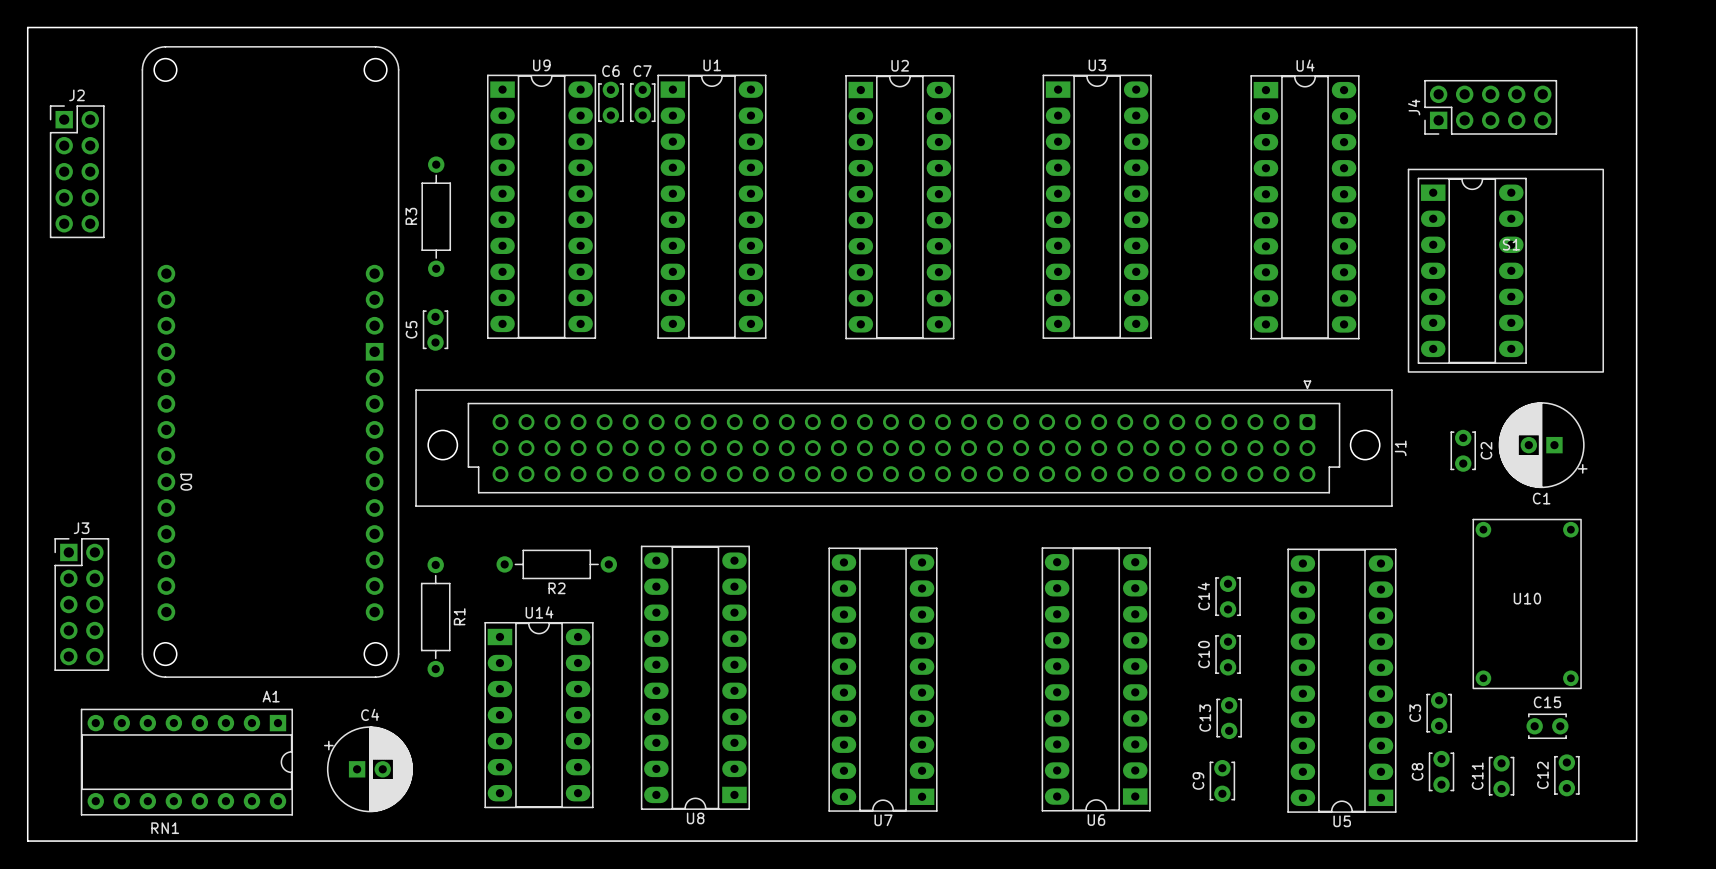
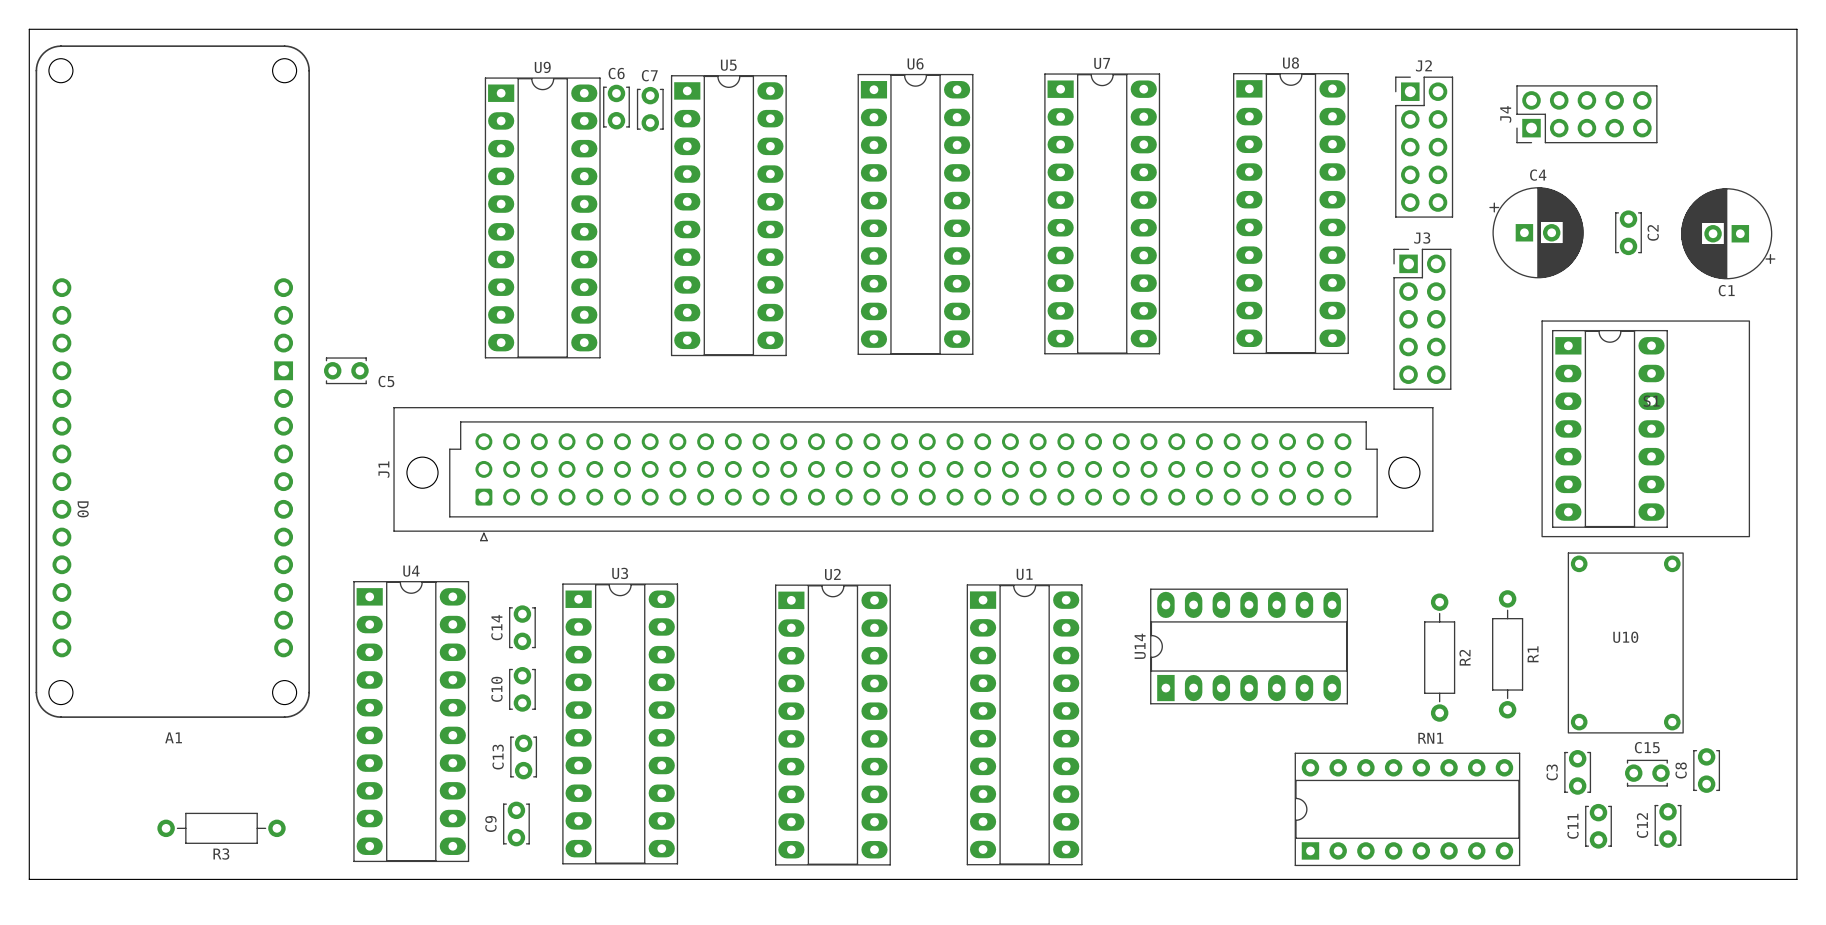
board edge: (27, 27) (27, 841) (1636, 841) (1636, 27) -> (29, 29) (29, 879) (1796, 879) (1796, 29) (1742, 29)
C6 name: C6 (610, 71) -> C7 (649, 75)
C6: none -> (616, 107)
C7: (642, 102) -> none
J2 position: (77, 171) -> (1424, 147)
U9 position: (541, 206) -> (542, 217)
U1 position: (711, 206) -> (1024, 724)
U3 position: (1097, 206) -> (620, 723)
U2 position: (899, 207) -> (832, 725)
U4 position: (1305, 207) -> (411, 721)
R3 name position: R3 (411, 216) -> R3 (221, 854)
R3 rotation: 0° (436, 216) -> 90° clockwise (221, 828)
R3 position: (436, 216) -> (221, 828)
S1 position: (1505, 270) -> (1645, 428)
C5 name position: C5 (411, 329) -> C5 (386, 381)
C5 rotation: 0° (435, 329) -> 90° clockwise (346, 370)
C5 position: (435, 329) -> (346, 370)
A1 position: (270, 361) -> (172, 381)
J1 rotation: 0° (903, 443) -> 180° (913, 474)
C1 position: (1543, 445) -> (1728, 233)
C2 position: (1463, 450) -> (1628, 232)
R2 rotation: 0° (556, 564) -> 90° clockwise (1439, 657)
R2 position: (556, 564) -> (1439, 657)
R2 name position: R2 (556, 588) -> R2 (1465, 657)
C14 position: (1228, 596) -> (522, 627)
J3 position: (81, 604) -> (1422, 319)
R1 position: (435, 617) -> (1507, 654)
C10 position: (1228, 654) -> (522, 689)
U8 rotation: 0° (695, 677) -> 180° (1290, 213)
U8 position: (695, 677) -> (1290, 213)
U7 rotation: 0° (882, 679) -> 180° (1102, 213)
U7 position: (882, 679) -> (1102, 213)
U6 rotation: 0° (1096, 679) -> 180° (915, 214)
U6 position: (1096, 679) -> (915, 214)
U5 rotation: 0° (1341, 680) -> 180° (728, 215)
U5 position: (1341, 680) -> (728, 215)
C3 position: (1439, 713) -> (1577, 772)
U14 rotation: 0° (539, 715) -> 90° counterclockwise (1249, 646)
U14 position: (539, 715) -> (1249, 646)
C13 position: (1229, 718) -> (523, 757)
RN1 rotation: 0° (186, 762) -> 180° (1407, 809)
RN1 position: (186, 762) -> (1407, 809)
C4 position: (368, 769) -> (1536, 232)
C8 position: (1441, 771) -> (1706, 770)
C9 position: (1222, 780) -> (516, 823)

